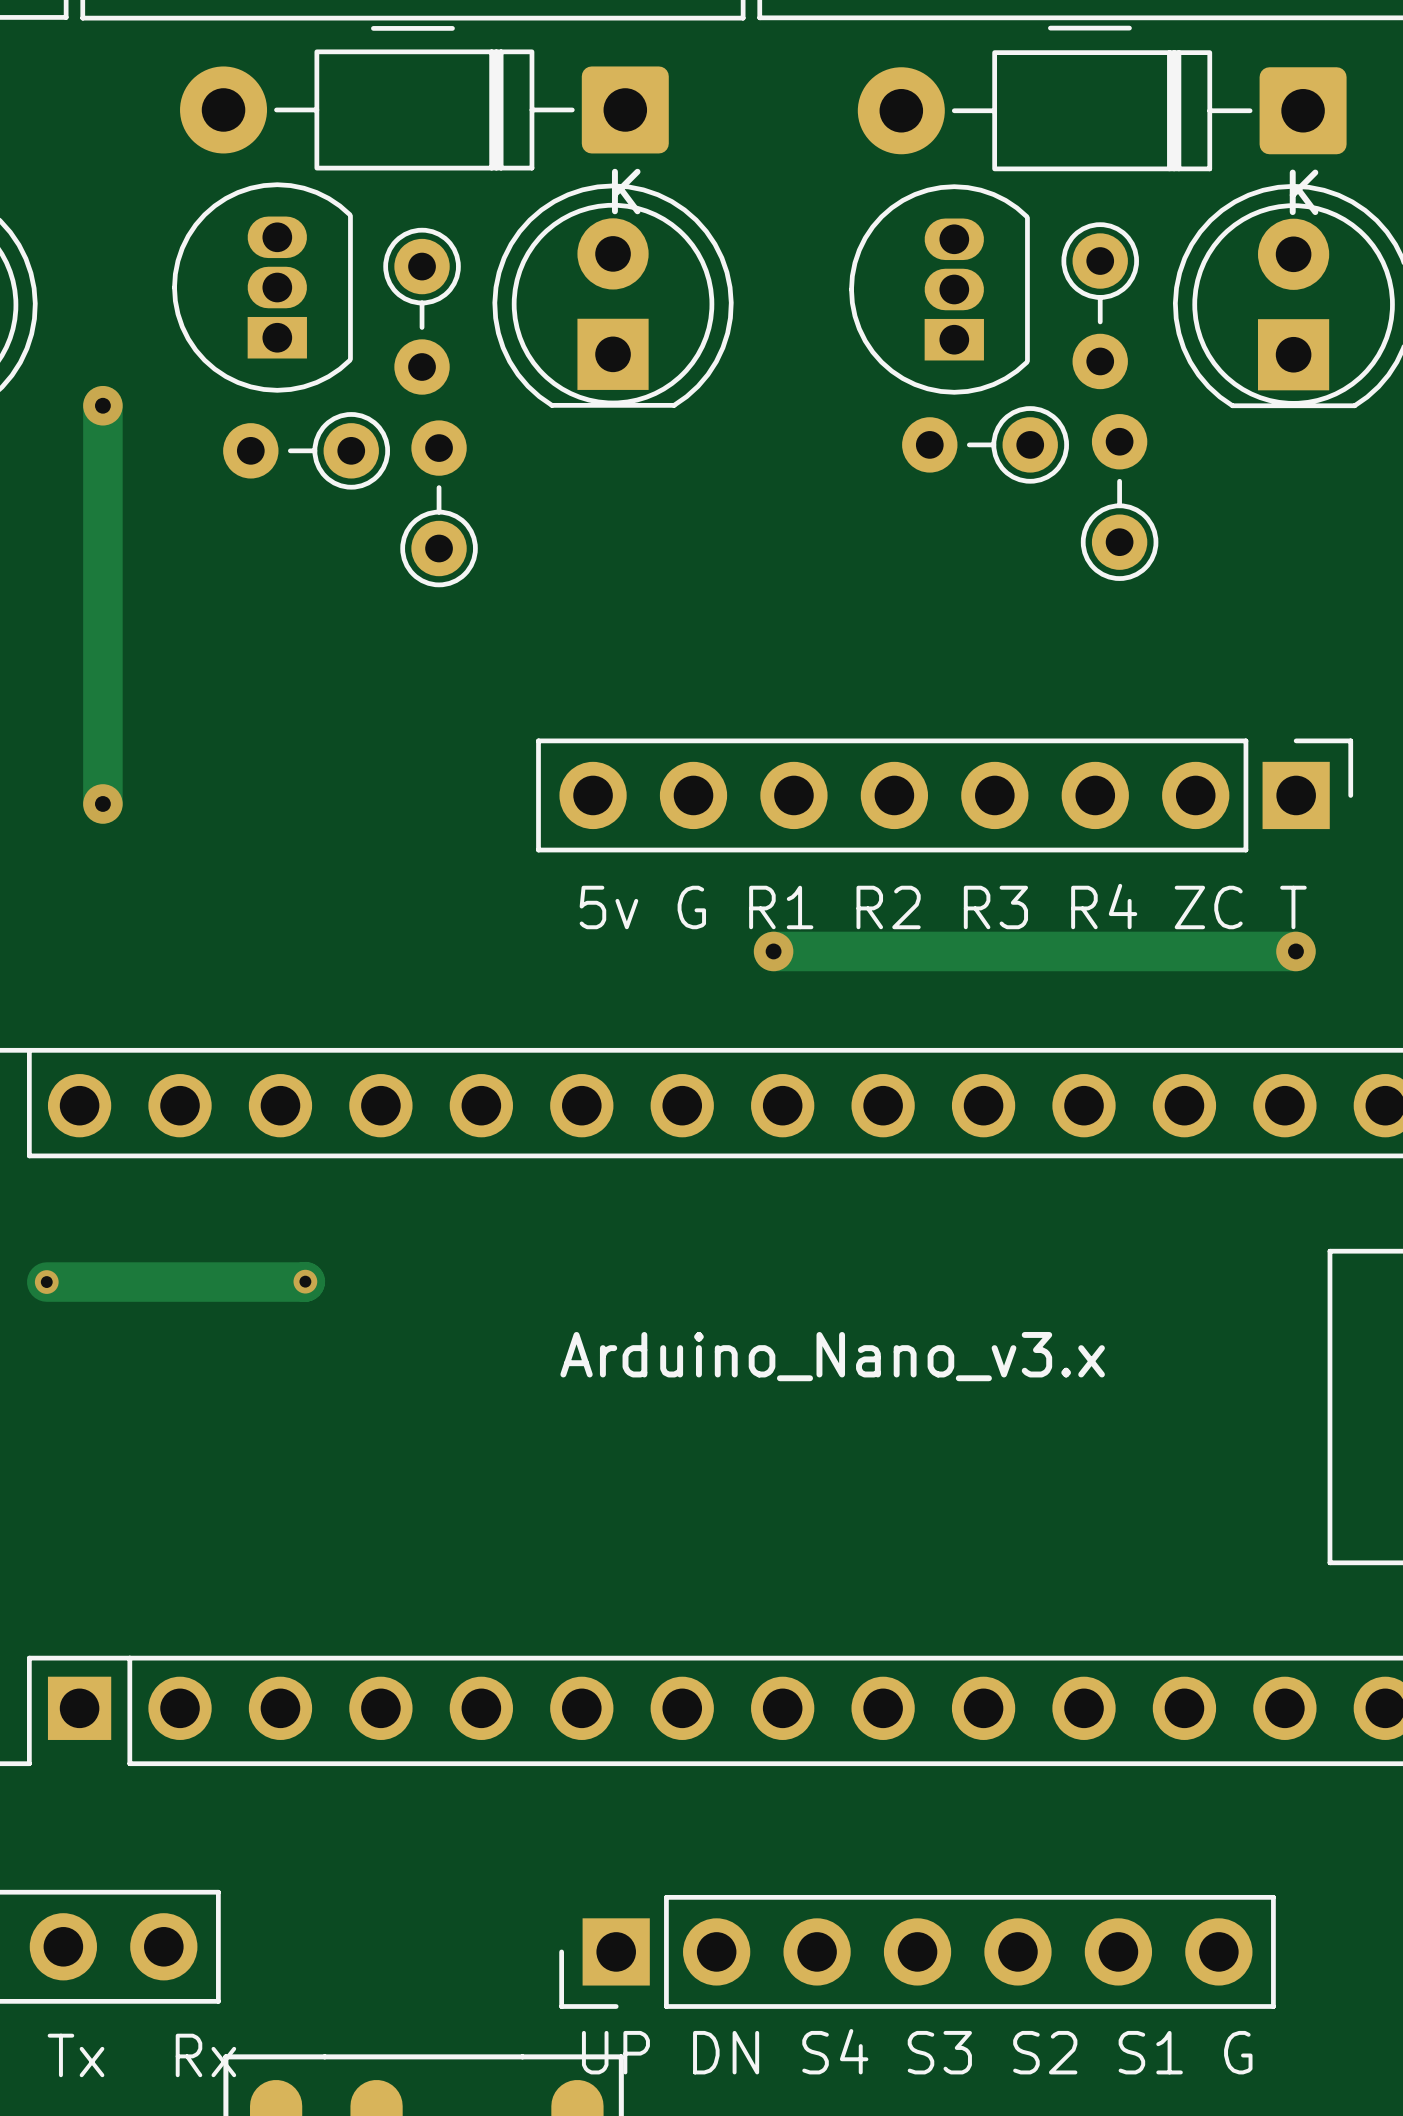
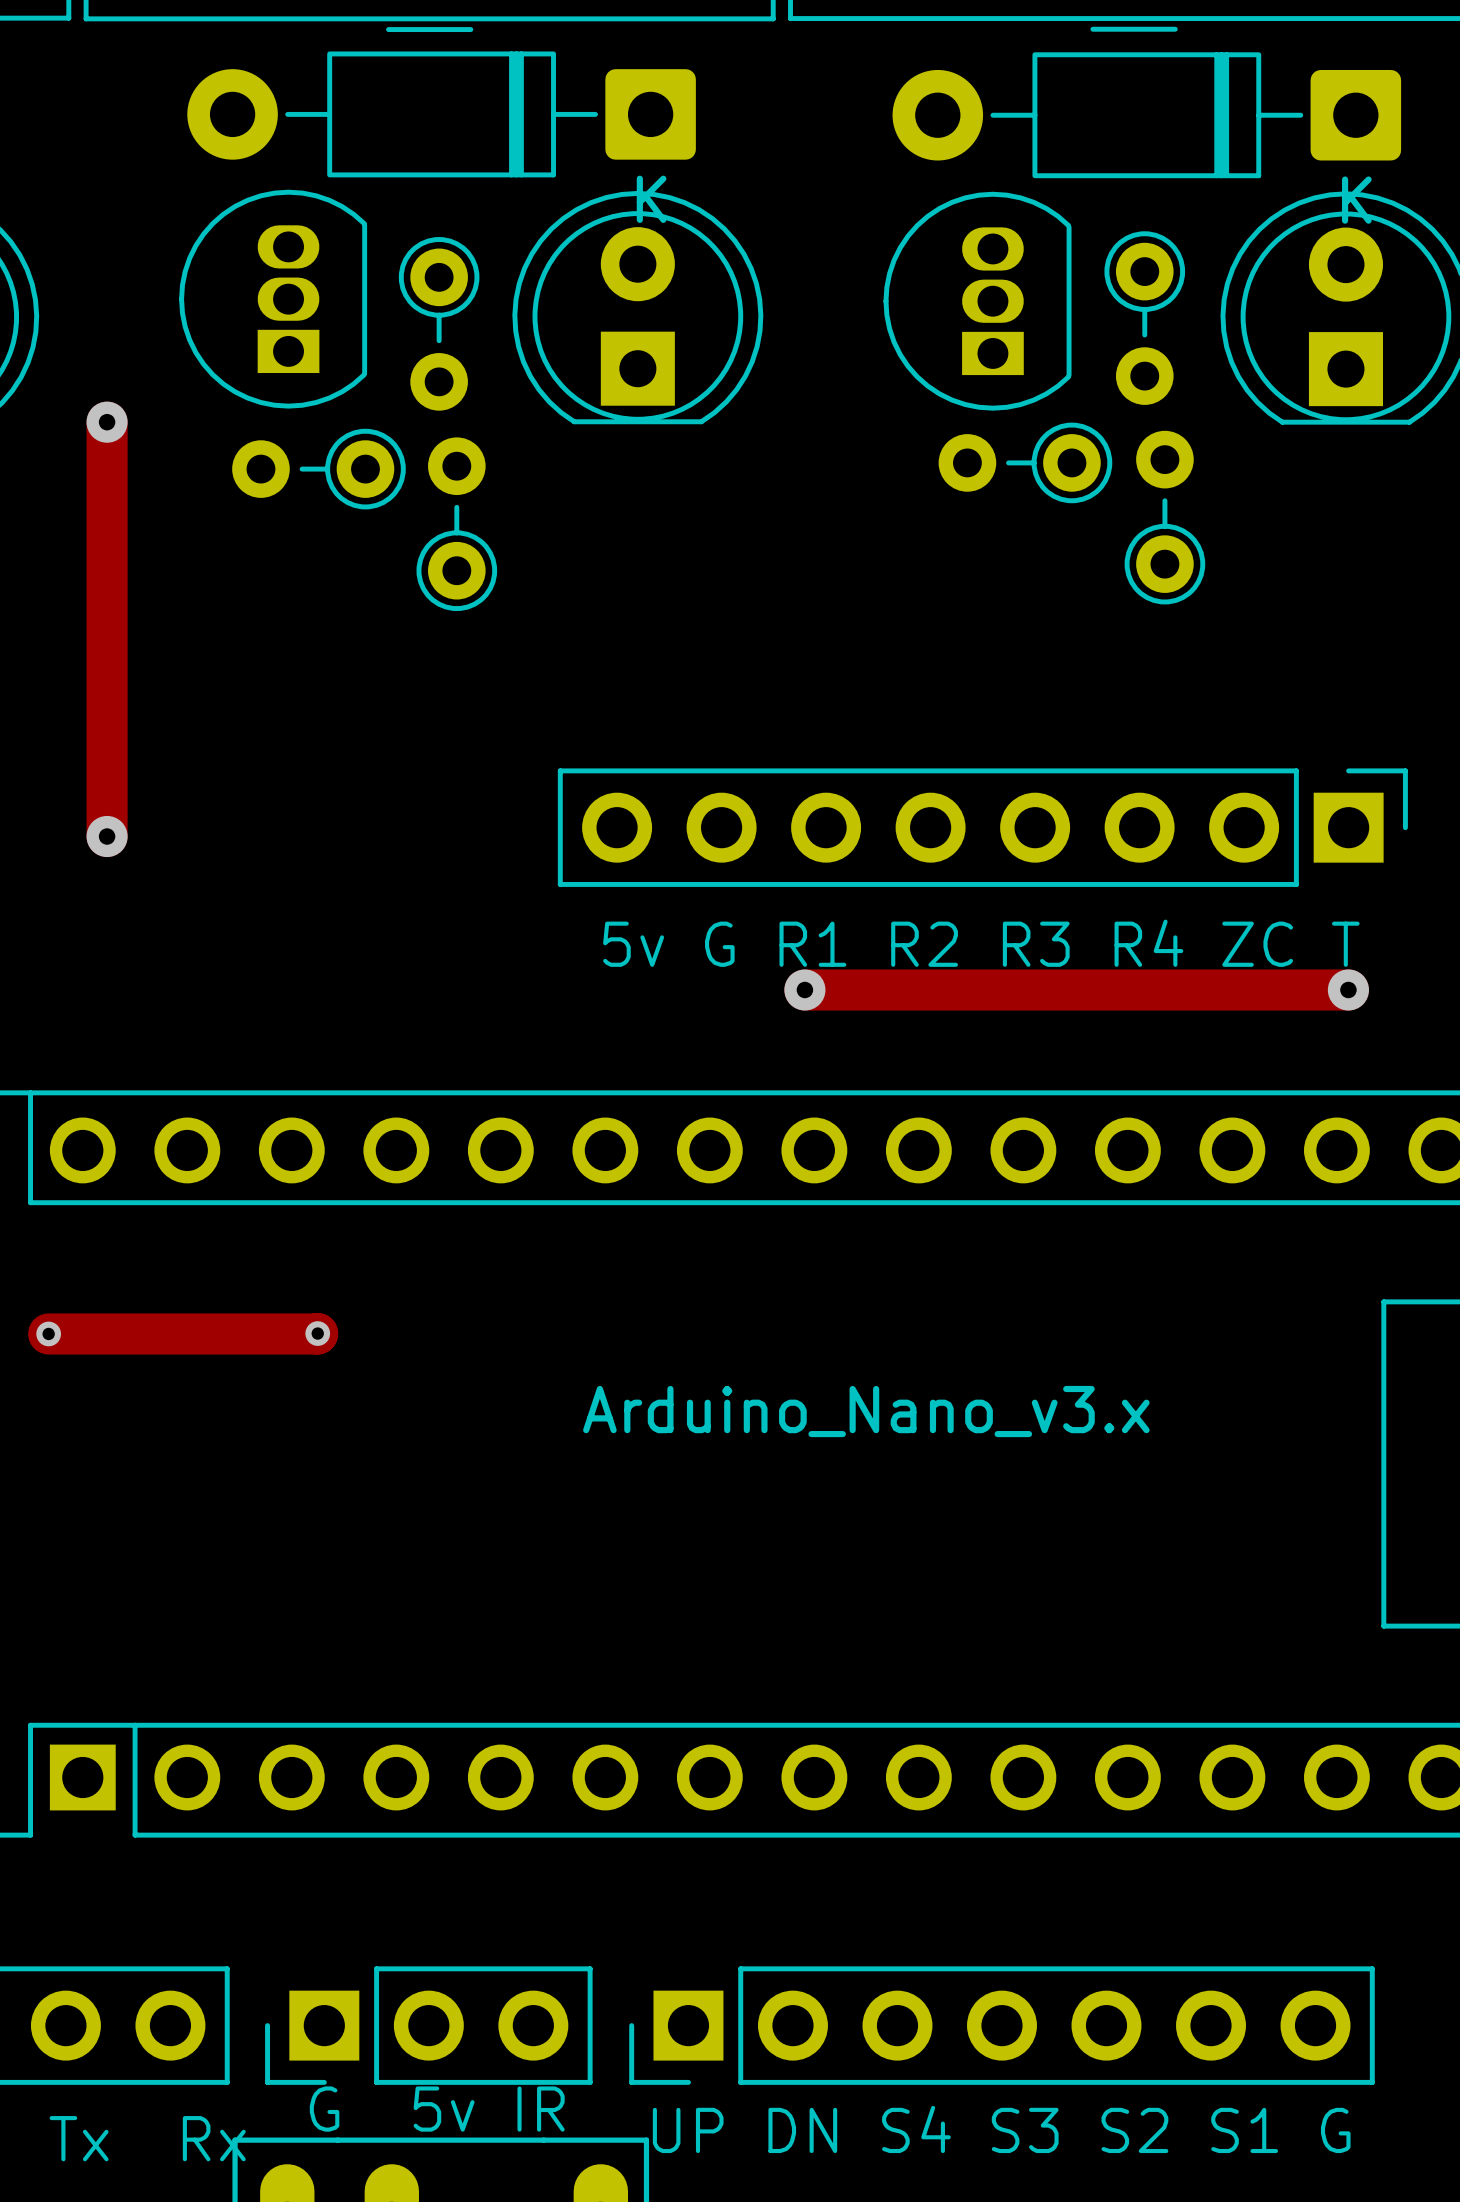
part: none -> (428, 2025)
part position: (917, 1951) -> (1001, 2025)
text: none -> G 5v IR (437, 2109)
text position: UP DN S4 S3 S2 S1 G (917, 2051) -> UP DN S4 S3 S2 S1 G (1001, 2129)

